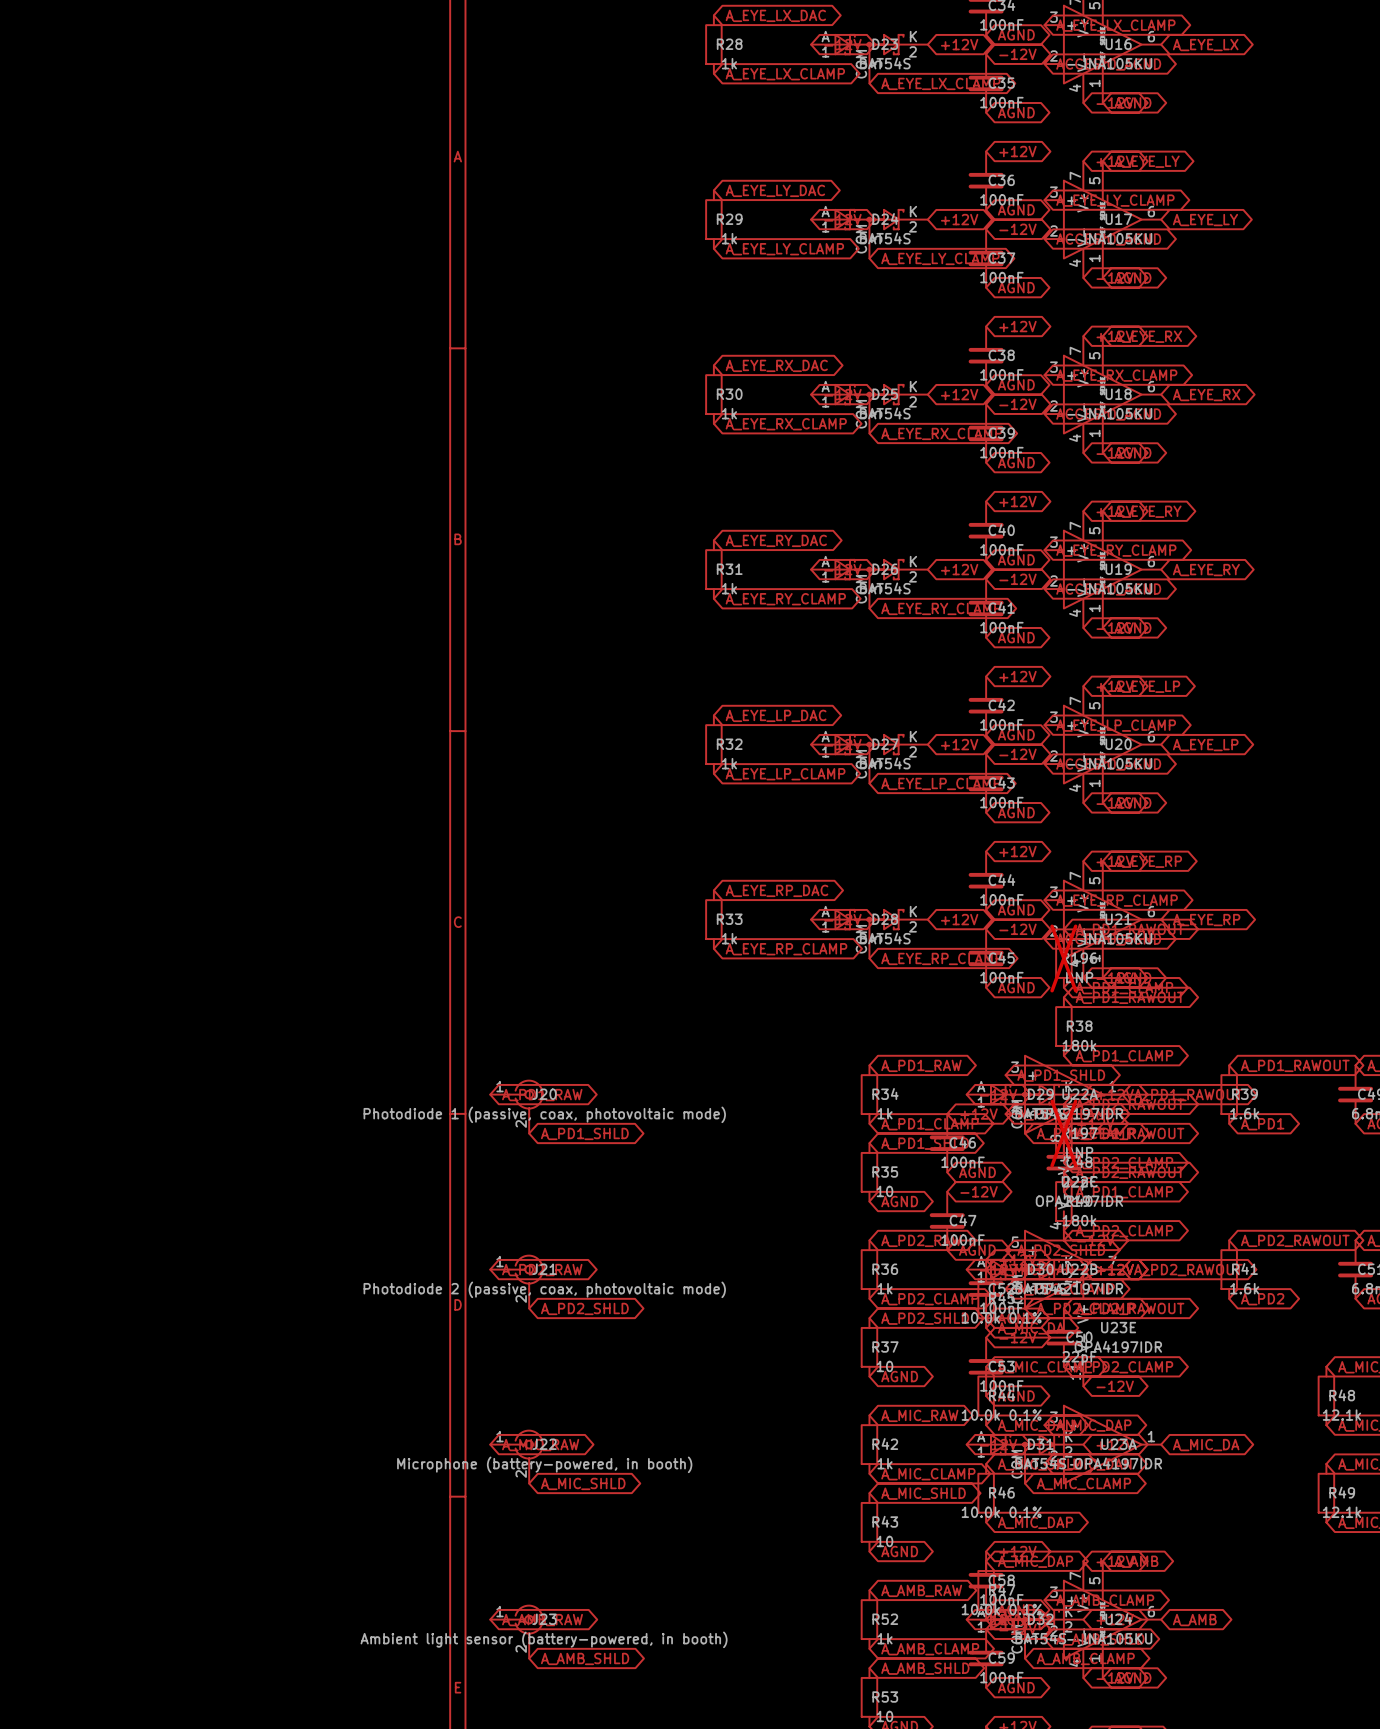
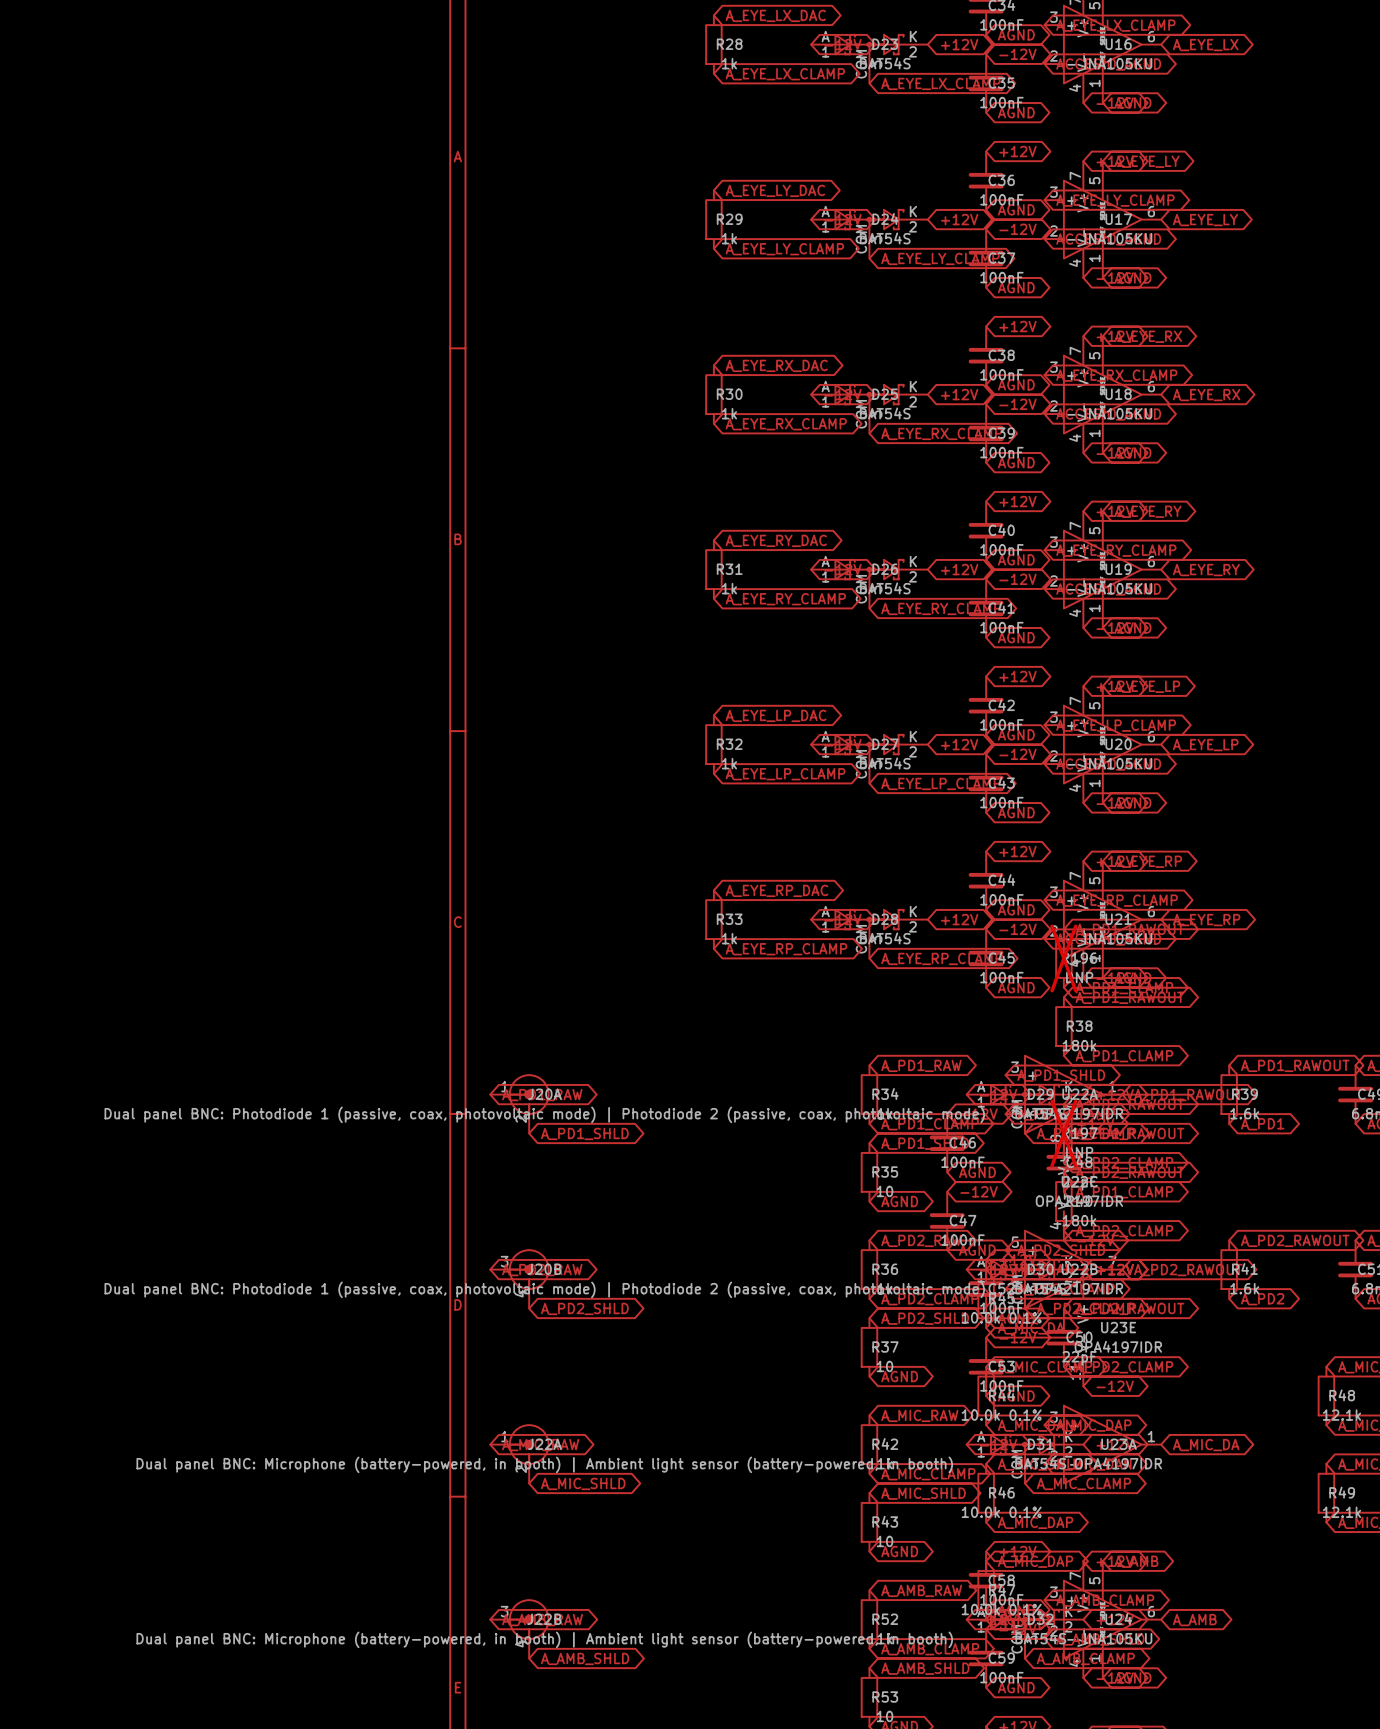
J20A: none -> Dual panel BNC: Photodiode 1 (passive, coax, photovoltaic mode) | Photodiode 2 (passive, coax, photovoltaic mode) (519, 1103)
J20: Photodiode 1 (passive, coax, photovoltaic mode) (517, 1106) -> none
J20B: none -> Dual panel BNC: Photodiode 1 (passive, coax, photovoltaic mode) | Photodiode 2 (passive, coax, photovoltaic mode) (519, 1278)
J21: Photodiode 2 (passive, coax, photovoltaic mode) (517, 1281) -> none
J22A: none -> Dual panel BNC: Microphone (battery-powered, in booth) | Ambient light sensor (battery-powered, in booth) (519, 1453)
J22: Microphone (battery-powered, in booth) (517, 1456) -> none
J22B: none -> Dual panel BNC: Microphone (battery-powered, in booth) | Ambient light sensor (battery-powered, in booth) (519, 1628)
J23: Ambient light sensor (battery-powered, in booth) (517, 1631) -> none

